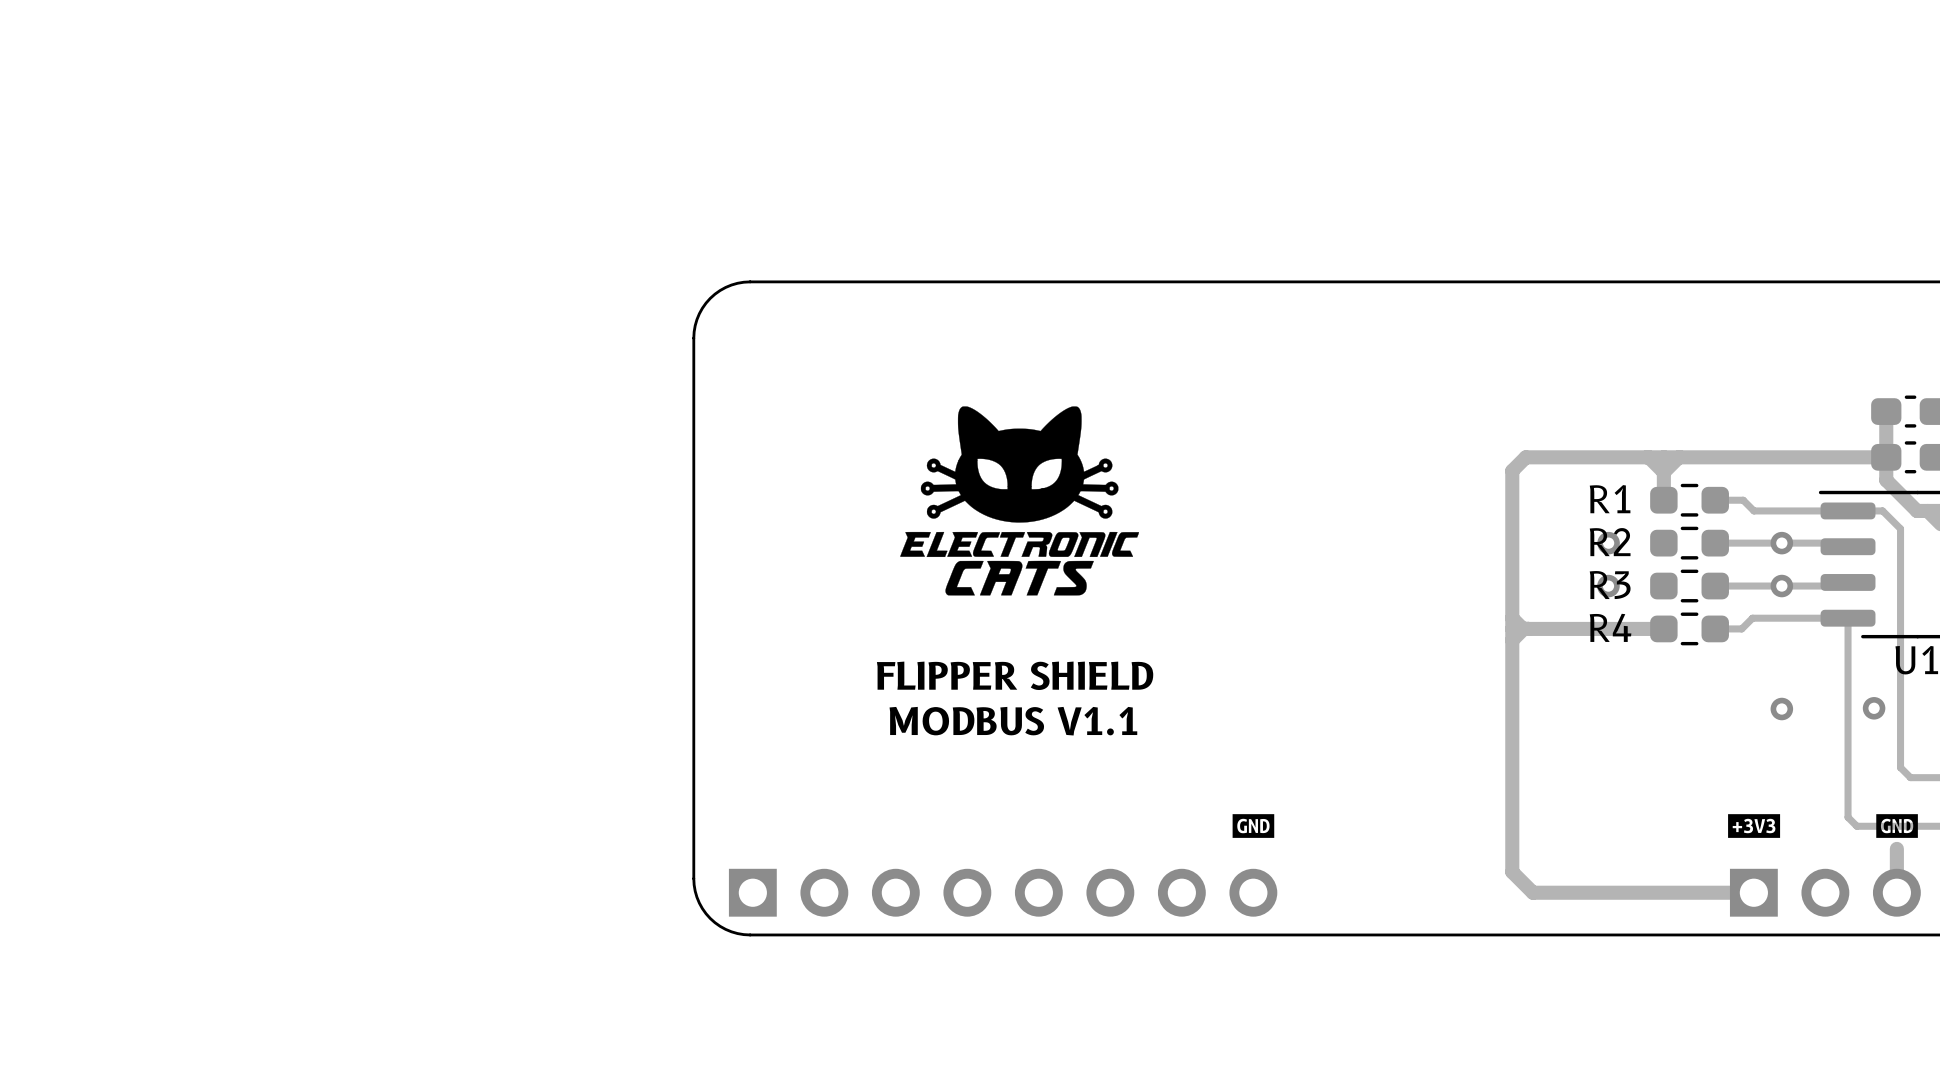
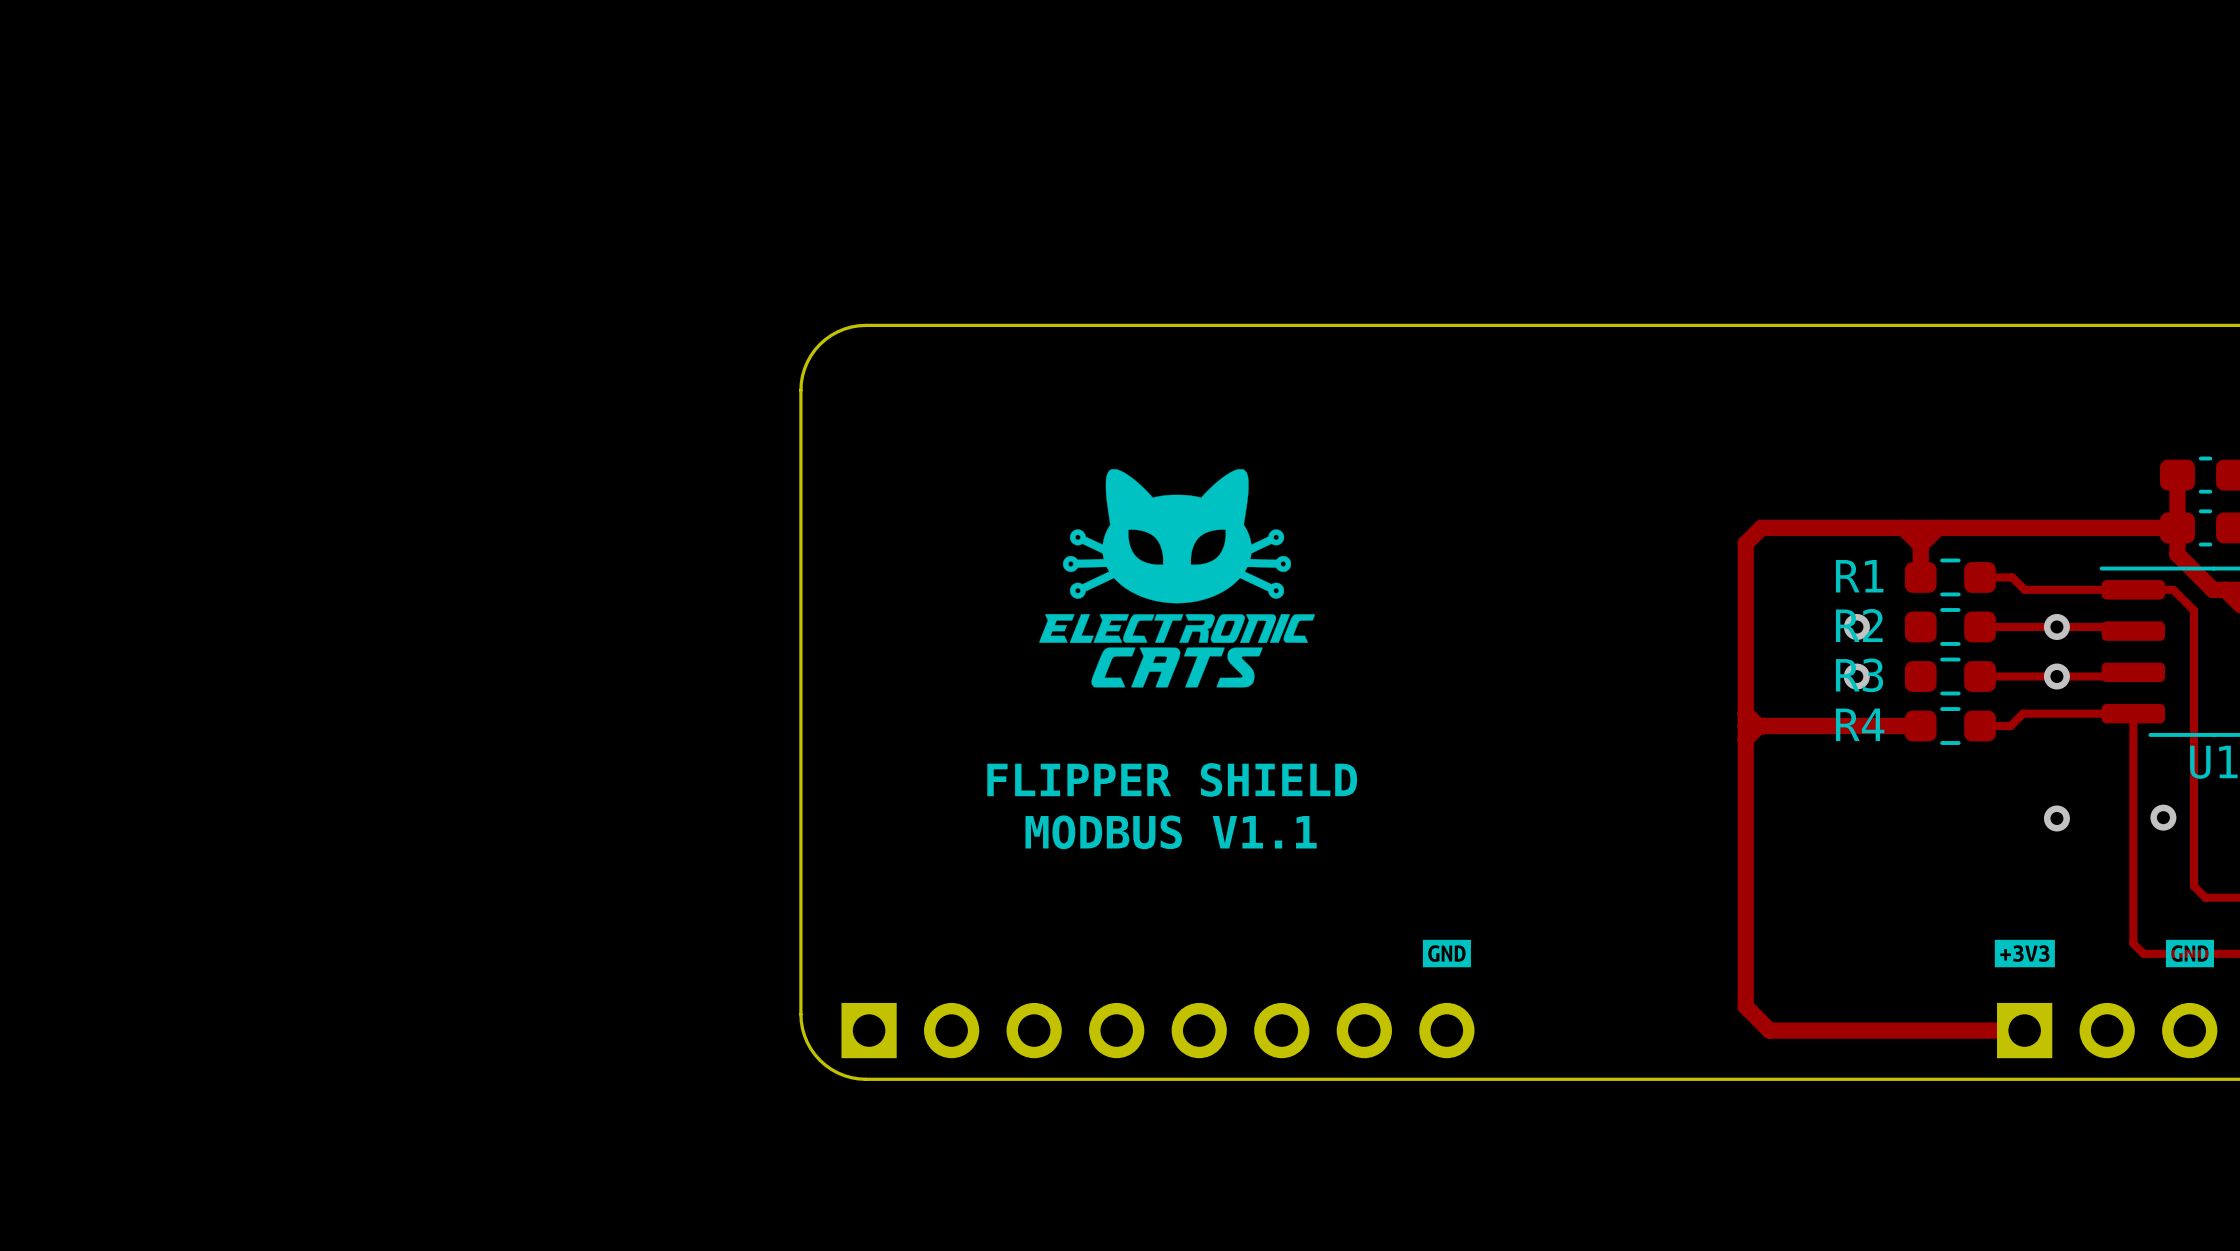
track: (1896, 848) (1896, 892) -> none

